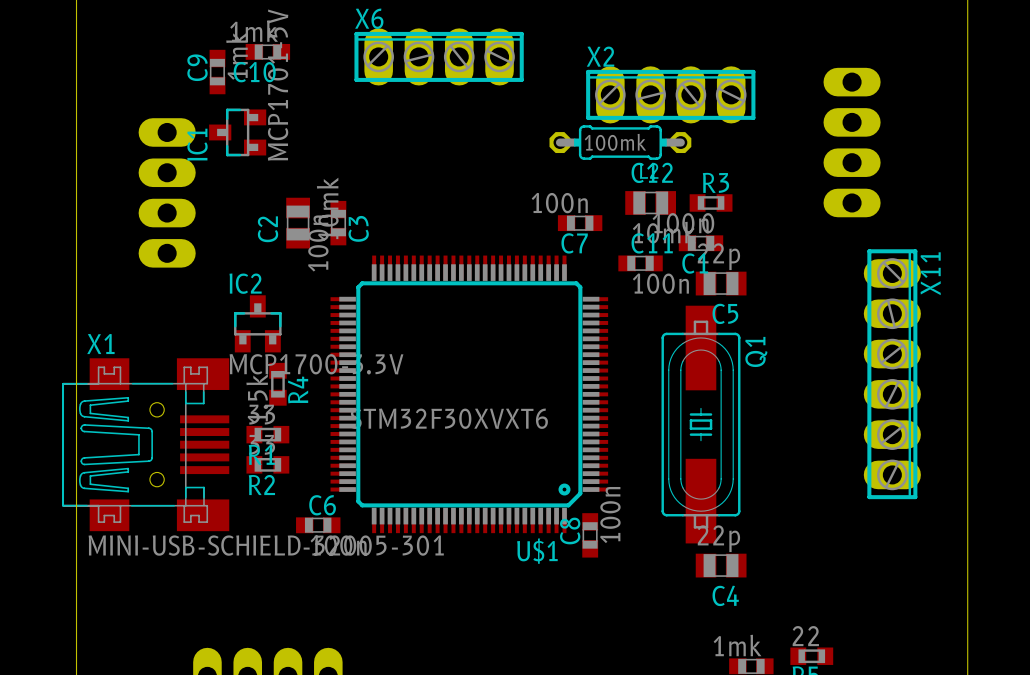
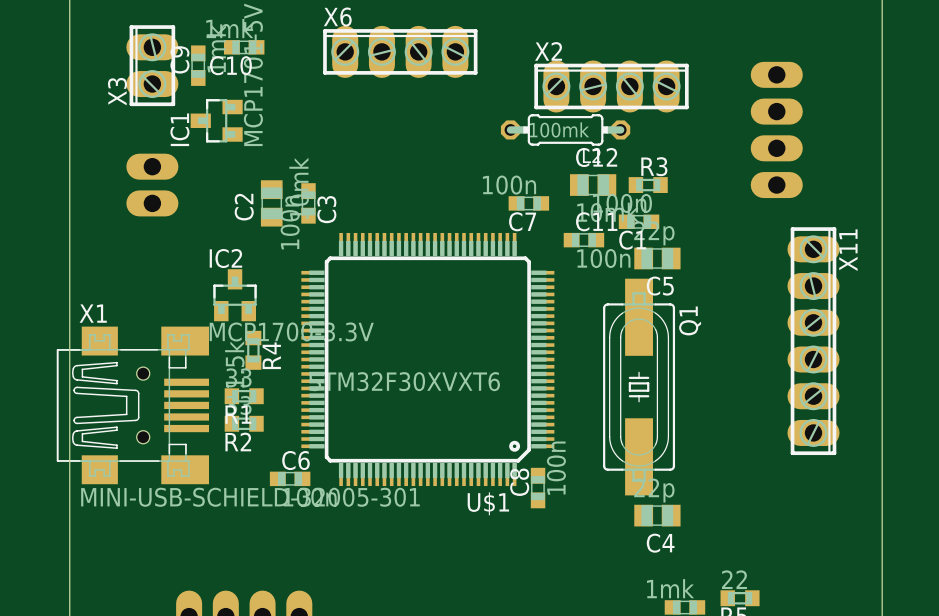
X3: none -> (152, 65)
part footprint: [138, 118, 196, 268] -> [126, 153, 179, 217]

